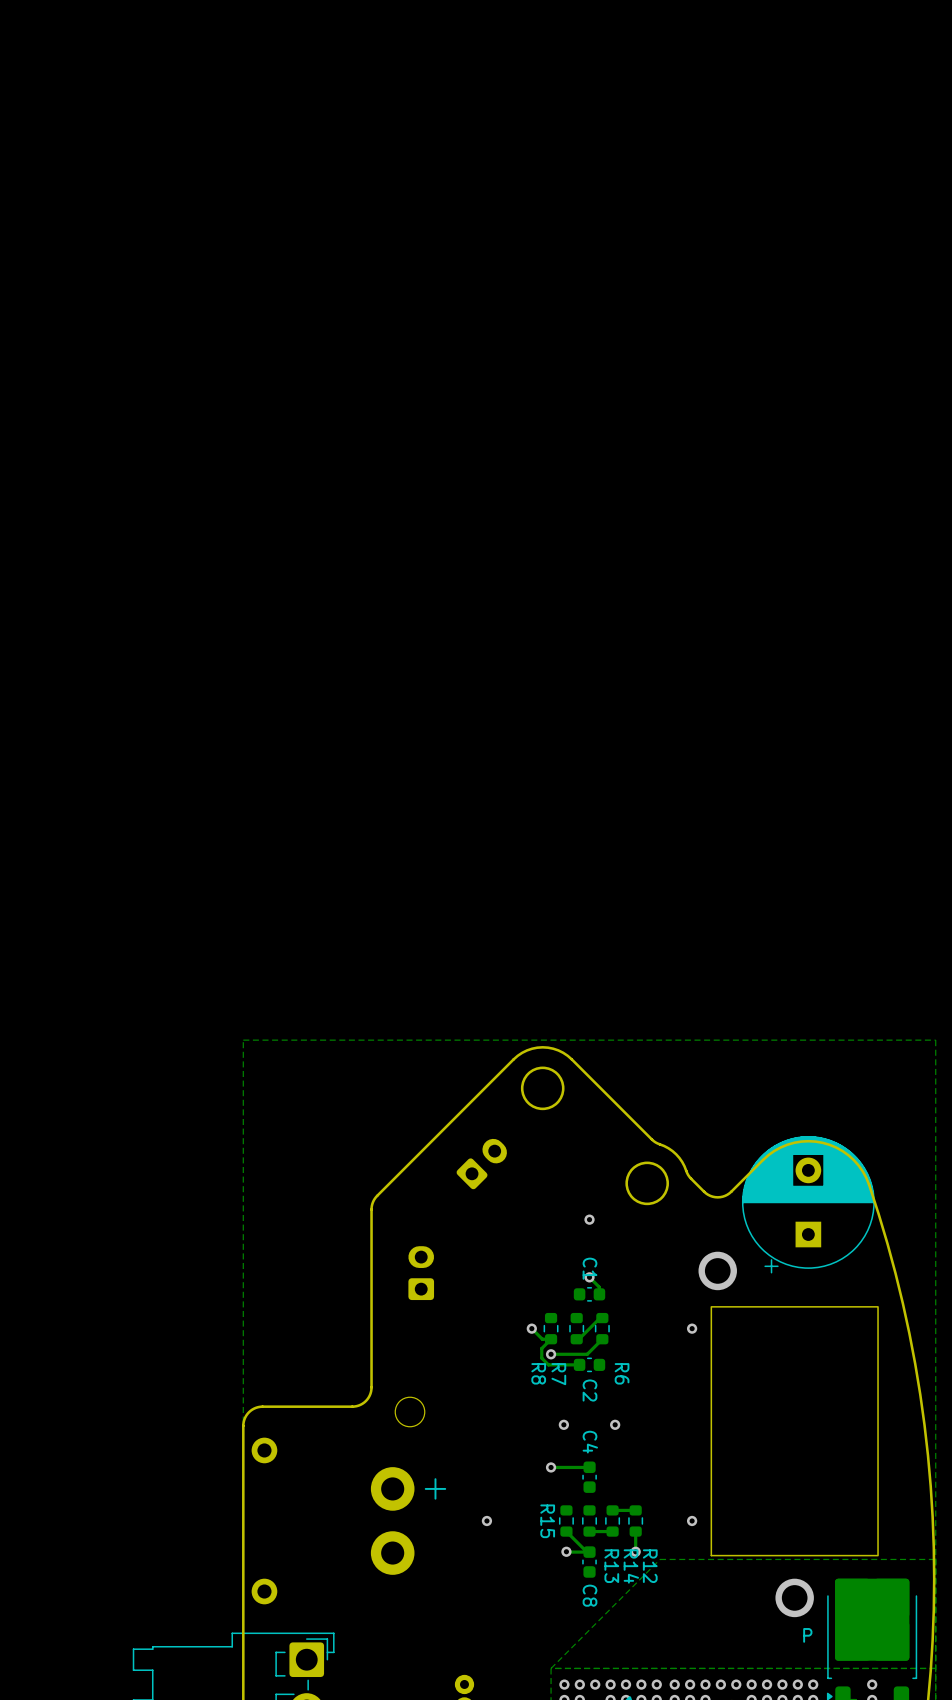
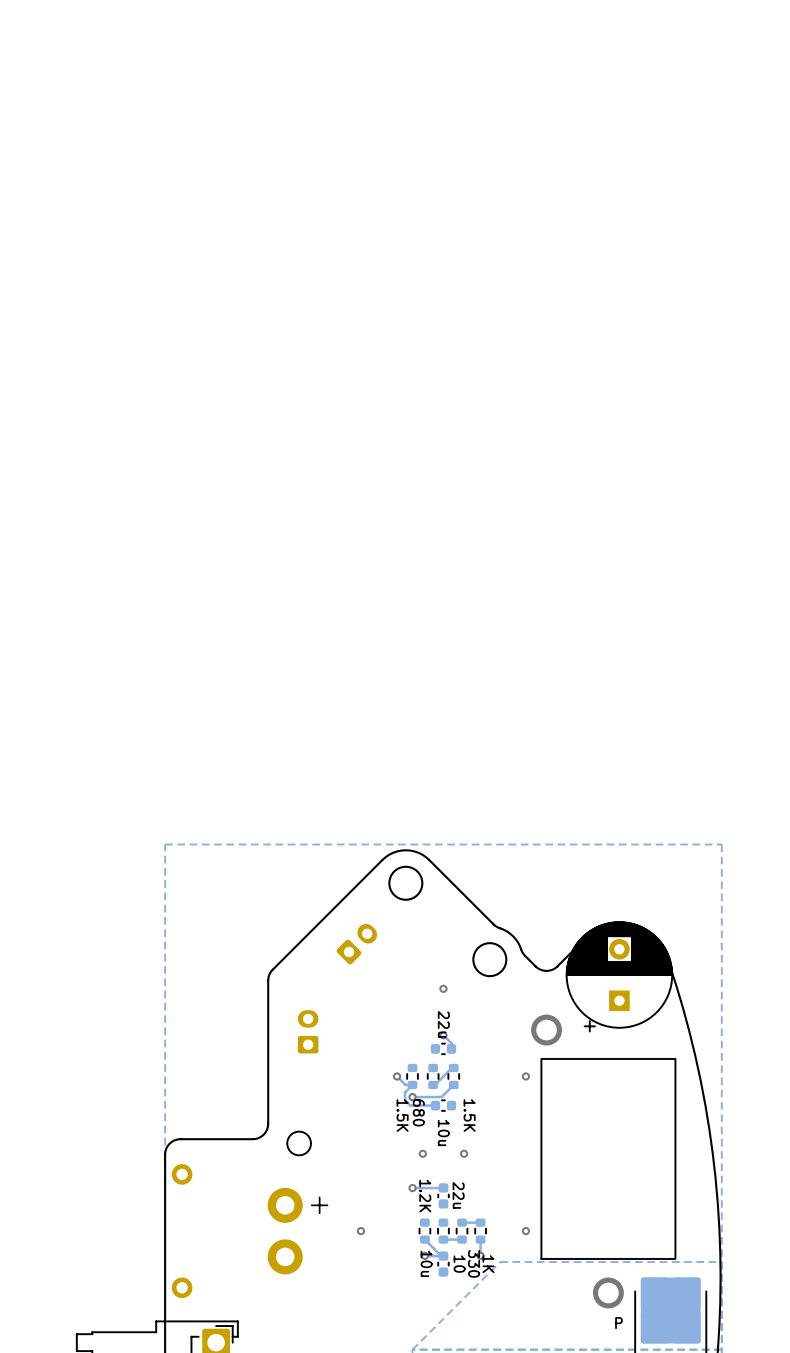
C1 name: C1 (589, 1268) -> 22u (443, 1024)
R8 name: R8 (538, 1373) -> 1.5K (402, 1115)
R6 name: R6 (622, 1373) -> 1.5K (469, 1115)
R7 name: R7 (558, 1374) -> 680 (418, 1112)
C2 name: C2 (589, 1390) -> 10u (443, 1132)
C4 name: C4 (590, 1442) -> 22u (458, 1195)
R15 name: R15 (547, 1521) -> 1.2K (425, 1196)
R13 name: R13 (611, 1566) -> 10 (459, 1264)
R14 name: R14 (631, 1566) -> 330 (474, 1263)
R12 name: R12 (650, 1566) -> 1K (488, 1264)
C8 name: C8 (589, 1595) -> 10u (426, 1263)

